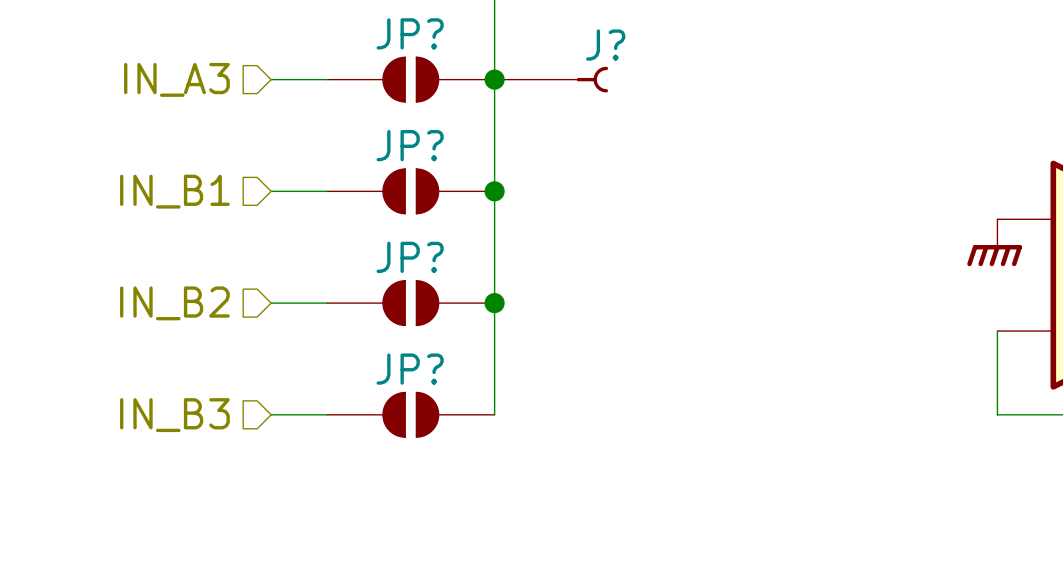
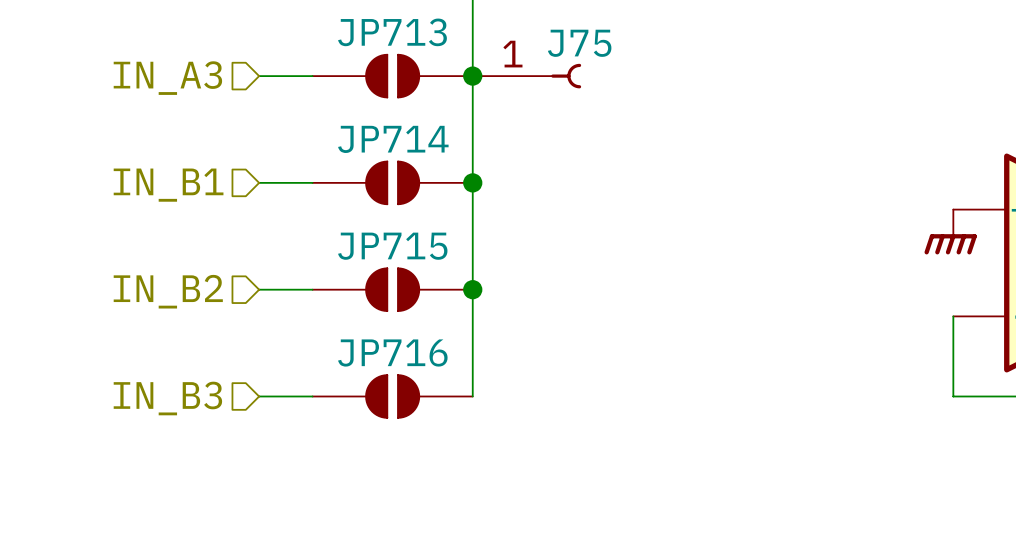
JP? name: JP? (410, 33) -> JP713 (392, 32)
J? name: J? (605, 45) -> J75 (579, 43)
J? pin number: none -> 1 (512, 54)
JP? name: JP? (410, 145) -> JP714 (393, 139)
JP? name: JP? (410, 257) -> JP715 (392, 246)
JP? name: JP? (410, 369) -> JP716 (392, 353)

